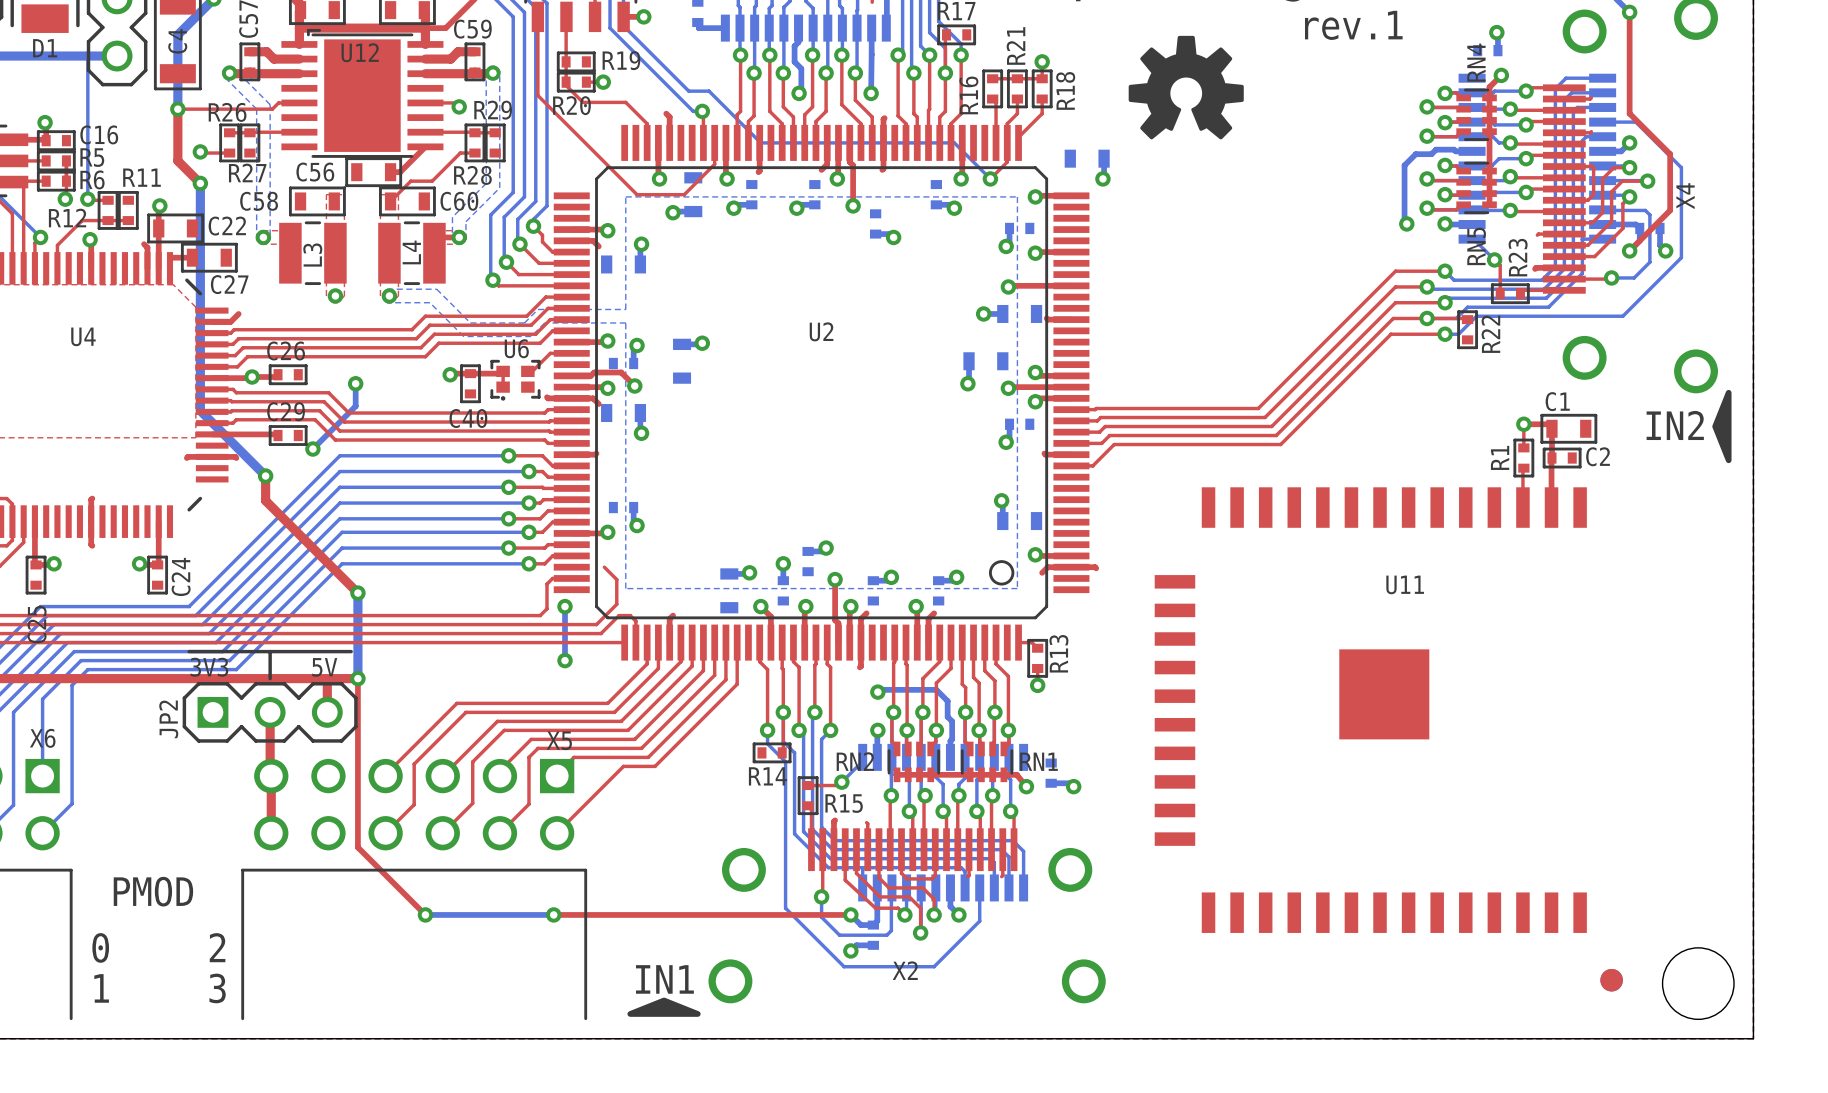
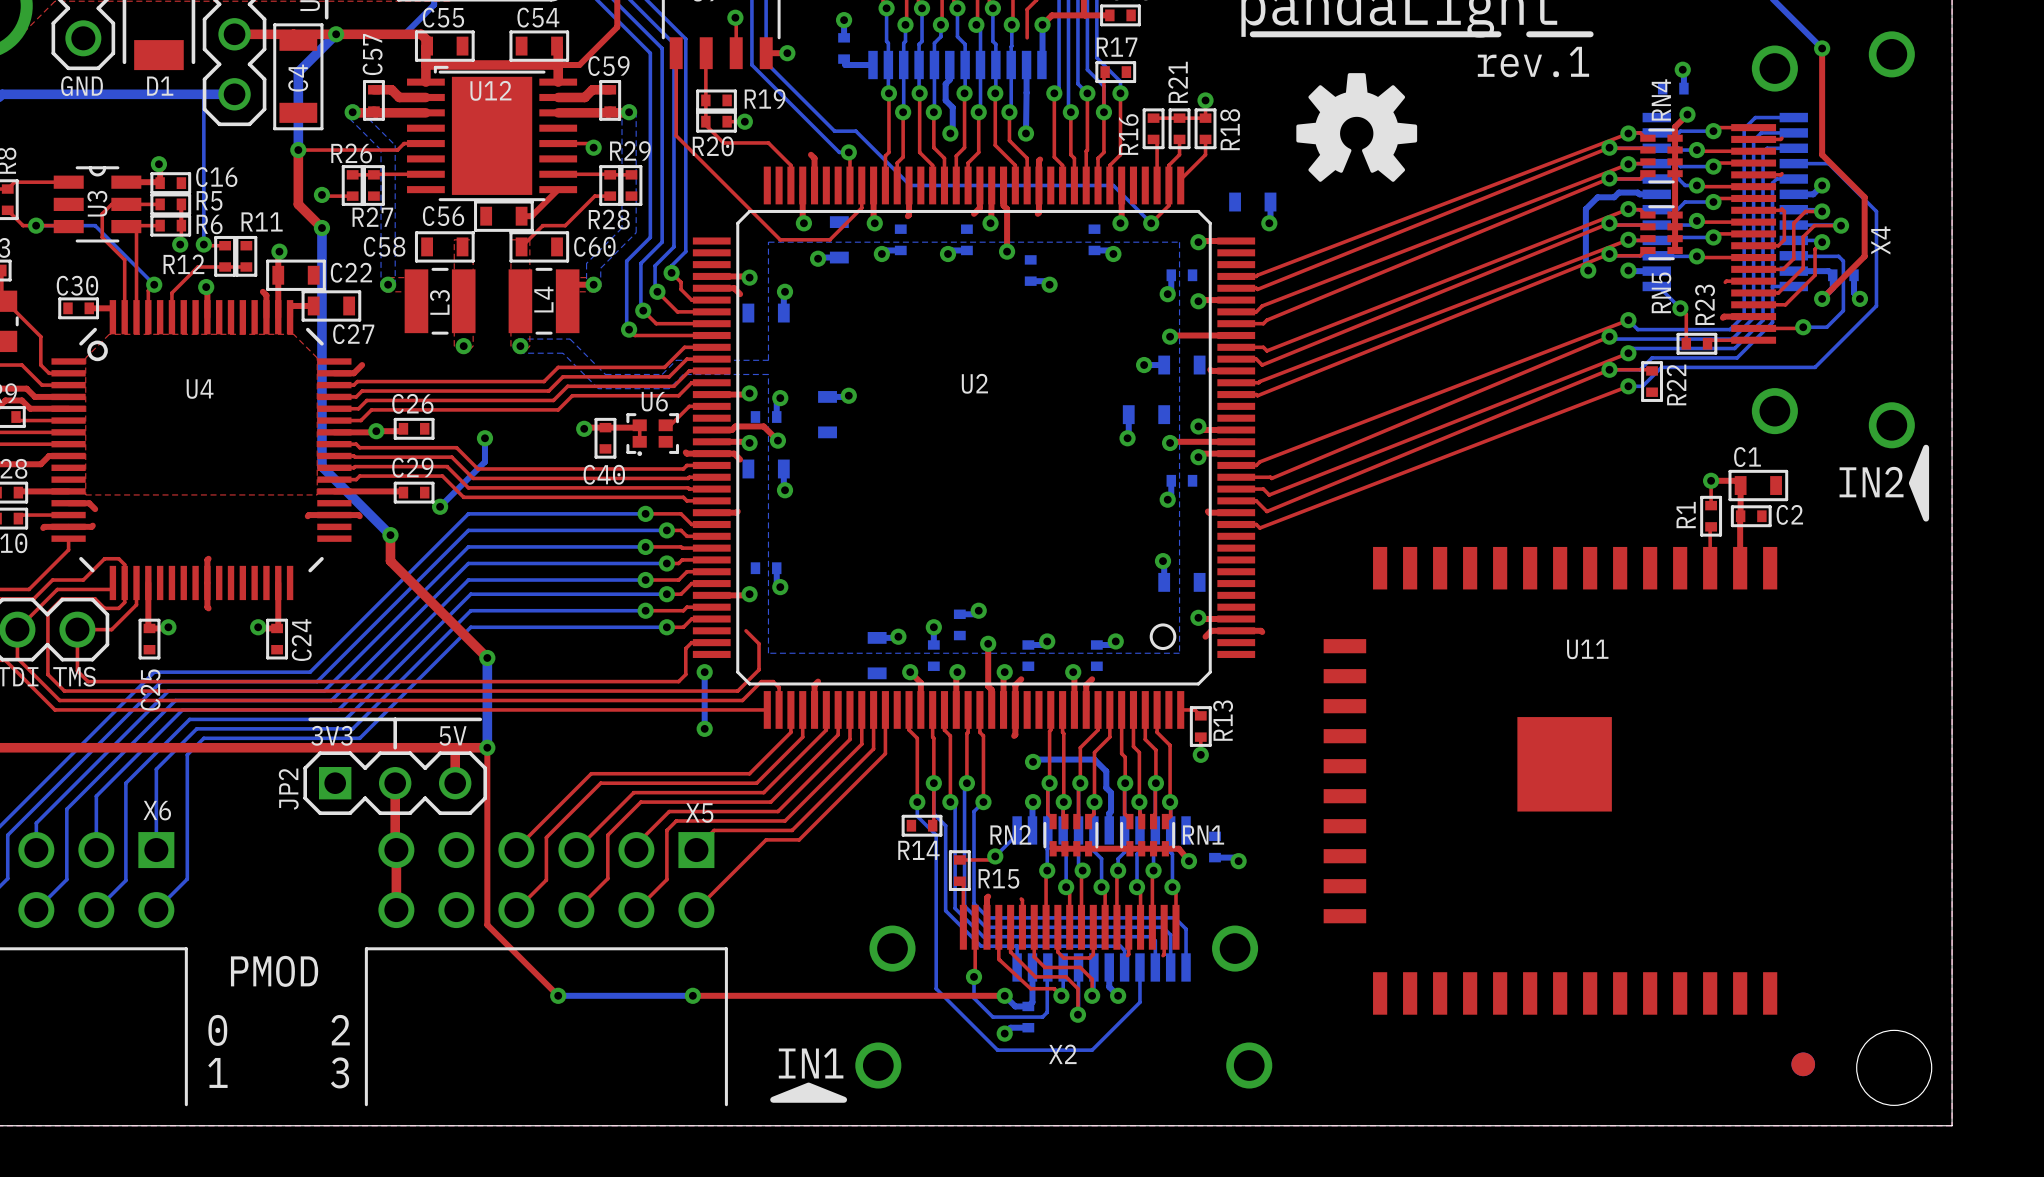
top track: none -> (1628, 133) (1256, 276) (1236, 276)
top track: none -> (1609, 147) (1257, 289) (1236, 288)
top track: none -> (1628, 164) (1262, 305) (1256, 311) (1236, 311)
top track: none -> (1609, 178) (1266, 320) (1263, 323) (1236, 323)
top track: none -> (1628, 209) (1266, 350) (1263, 347) (1236, 347)
top track: none -> (1609, 223) (1262, 365) (1256, 359) (1236, 359)
top track: none -> (1628, 239) (1258, 382) (1236, 382)
top track: none -> (1609, 254) (1257, 395) (1236, 394)
top track: (1445, 271) (1395, 271) (1258, 408) (1090, 409) -> (1628, 320) (1259, 461) (1256, 465)
top track: (1427, 286) (1395, 286) (1265, 417) (1100, 417) (1097, 420) -> (1609, 336) (1271, 478) (1263, 477)
top track: (1445, 302) (1395, 302) (1271, 426) (1105, 426) (1097, 432) -> (1628, 353) (1269, 494) (1263, 489)
top track: (1427, 318) (1393, 318) (1276, 435) (1109, 435) (1101, 443) (1090, 443) -> (1609, 369) (1266, 511) (1256, 500)
top track: (1445, 334) (1391, 334) (1280, 444) (1114, 444) (1092, 465) (1090, 465) -> (1628, 386) (1259, 528) (1256, 524)

